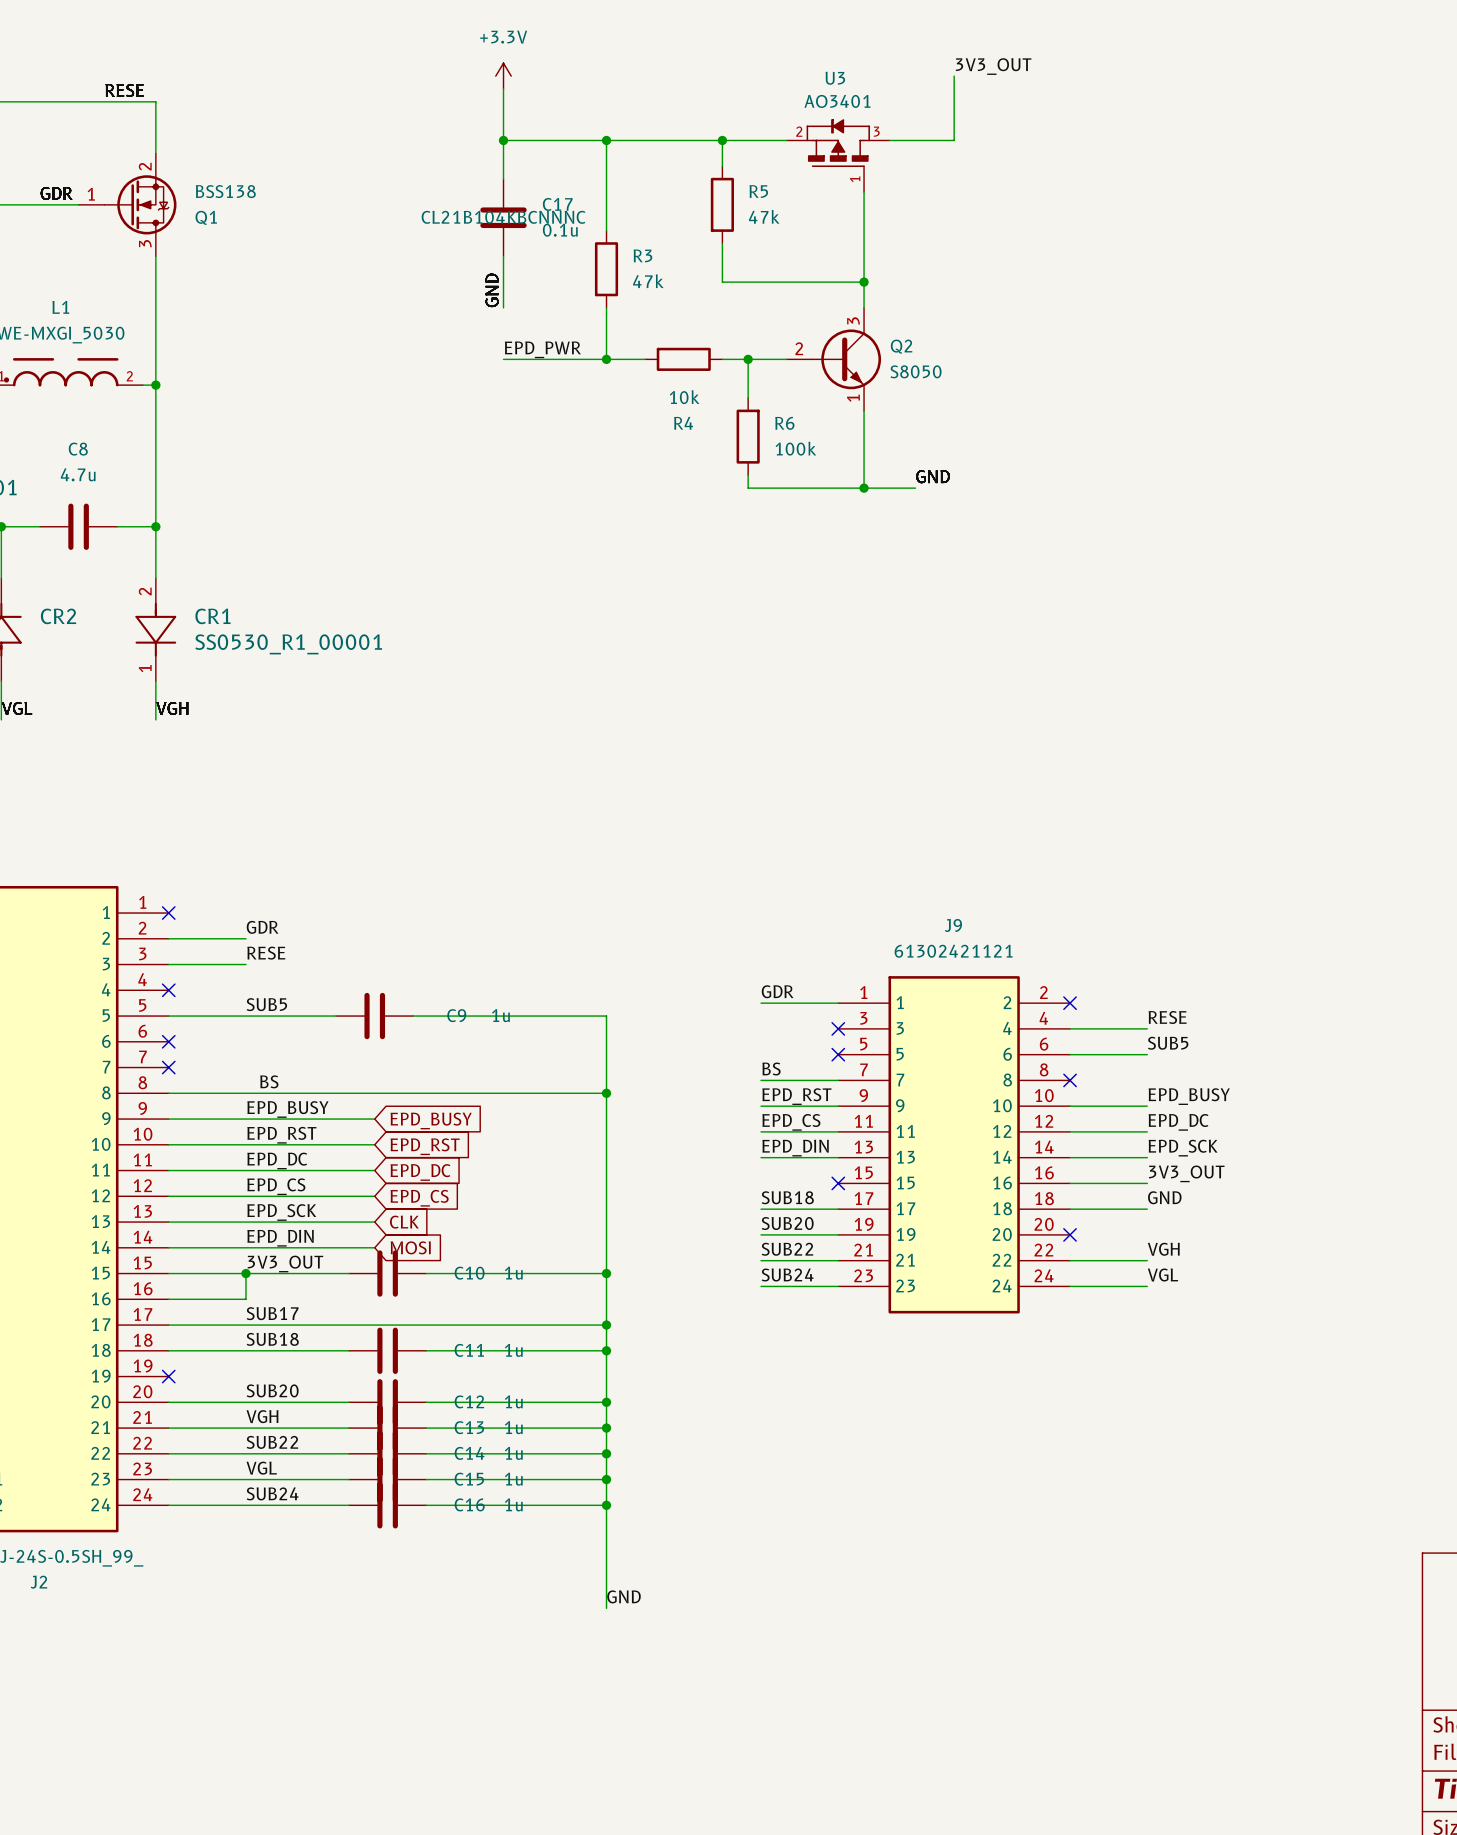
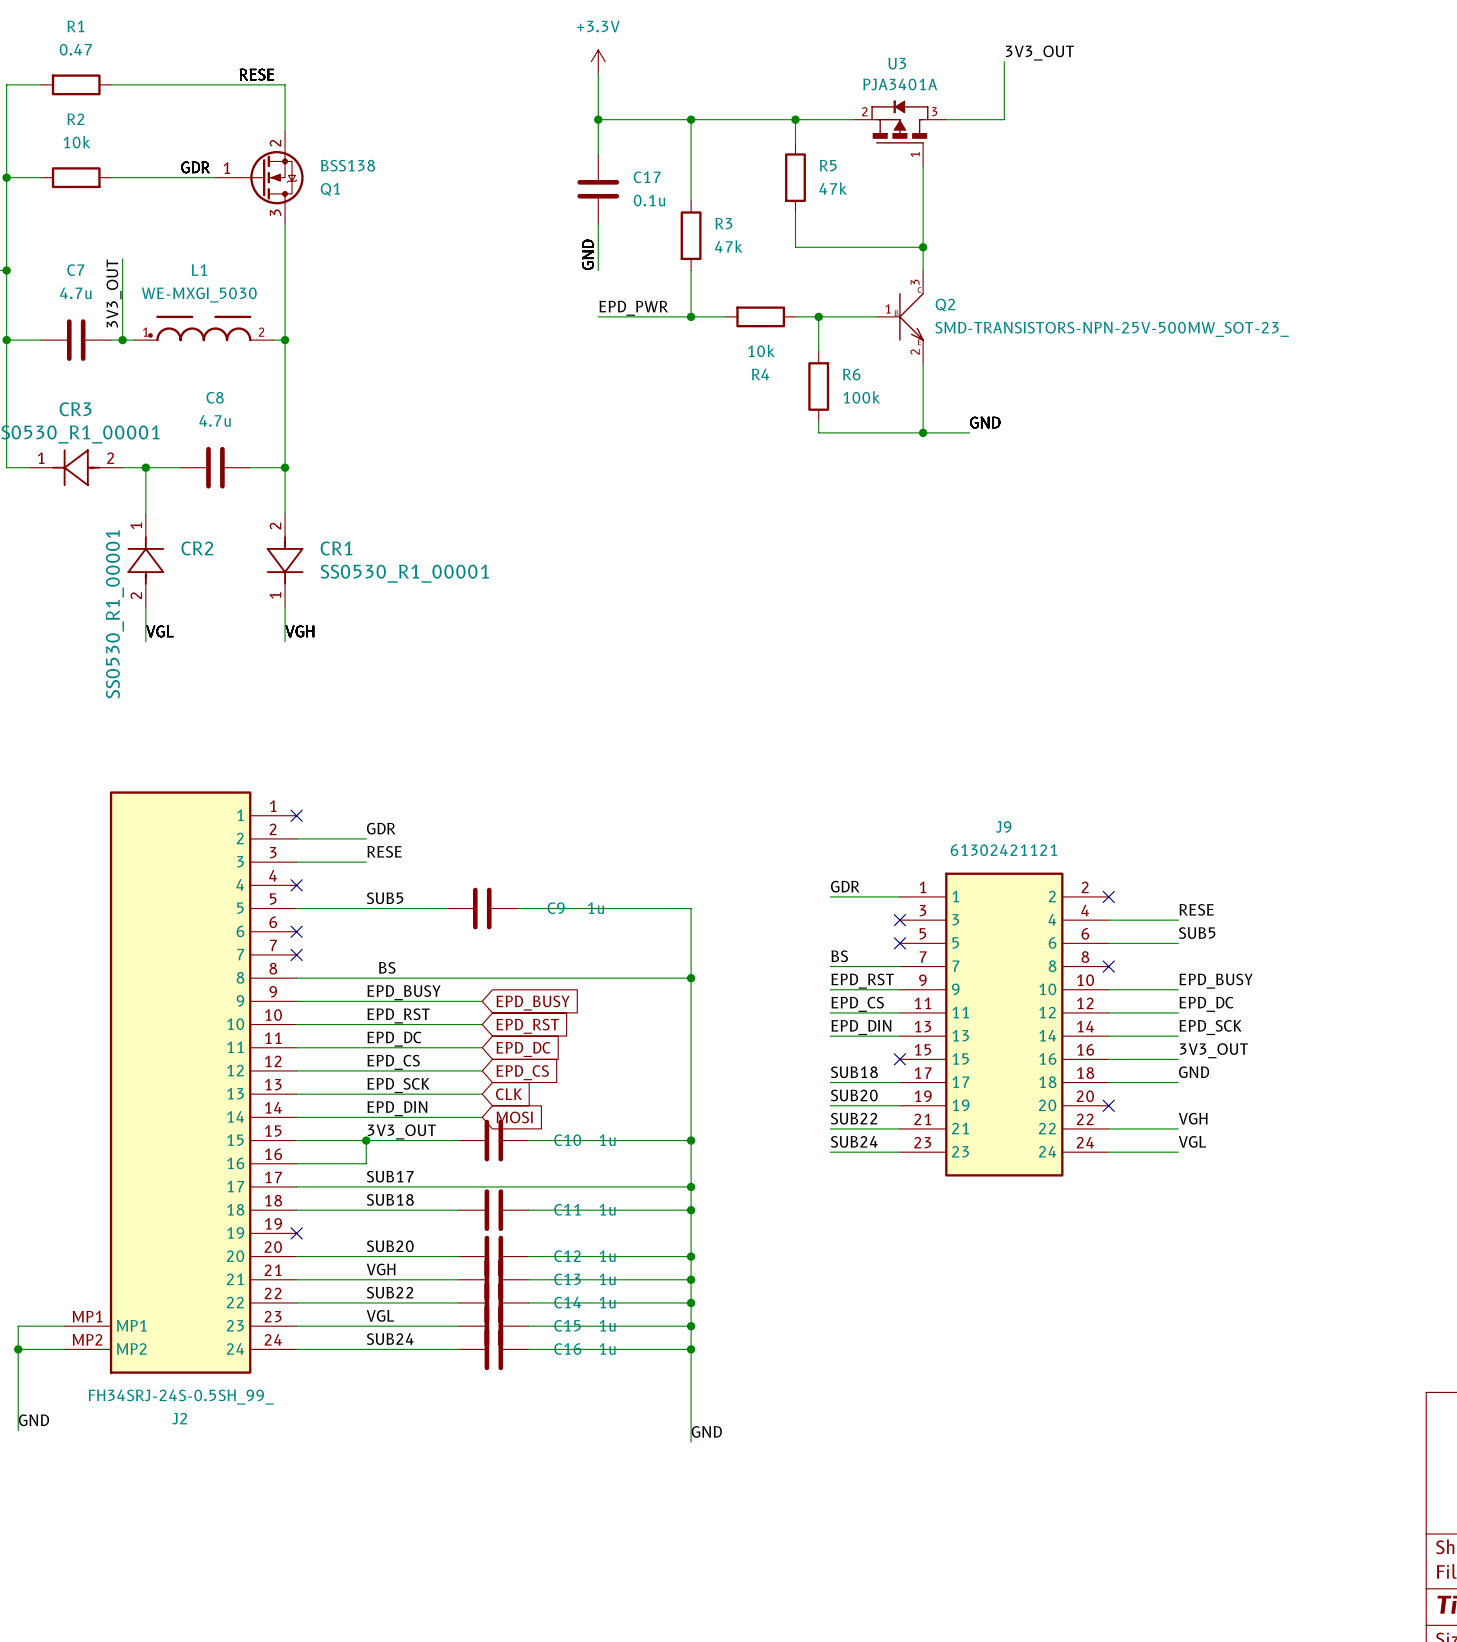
U3 value: AO3401 (837, 101) -> PJA3401A (900, 84)
C17 text: CL21B104KBCNNNC (503, 217) -> none
Q2 symbol: [786, 307, 882, 411] -> [876, 270, 924, 364]
Q2 value: S8050 (916, 371) -> SMD-TRANSISTORS-NPN-25V-500MW_SOT-23_ (1112, 329)

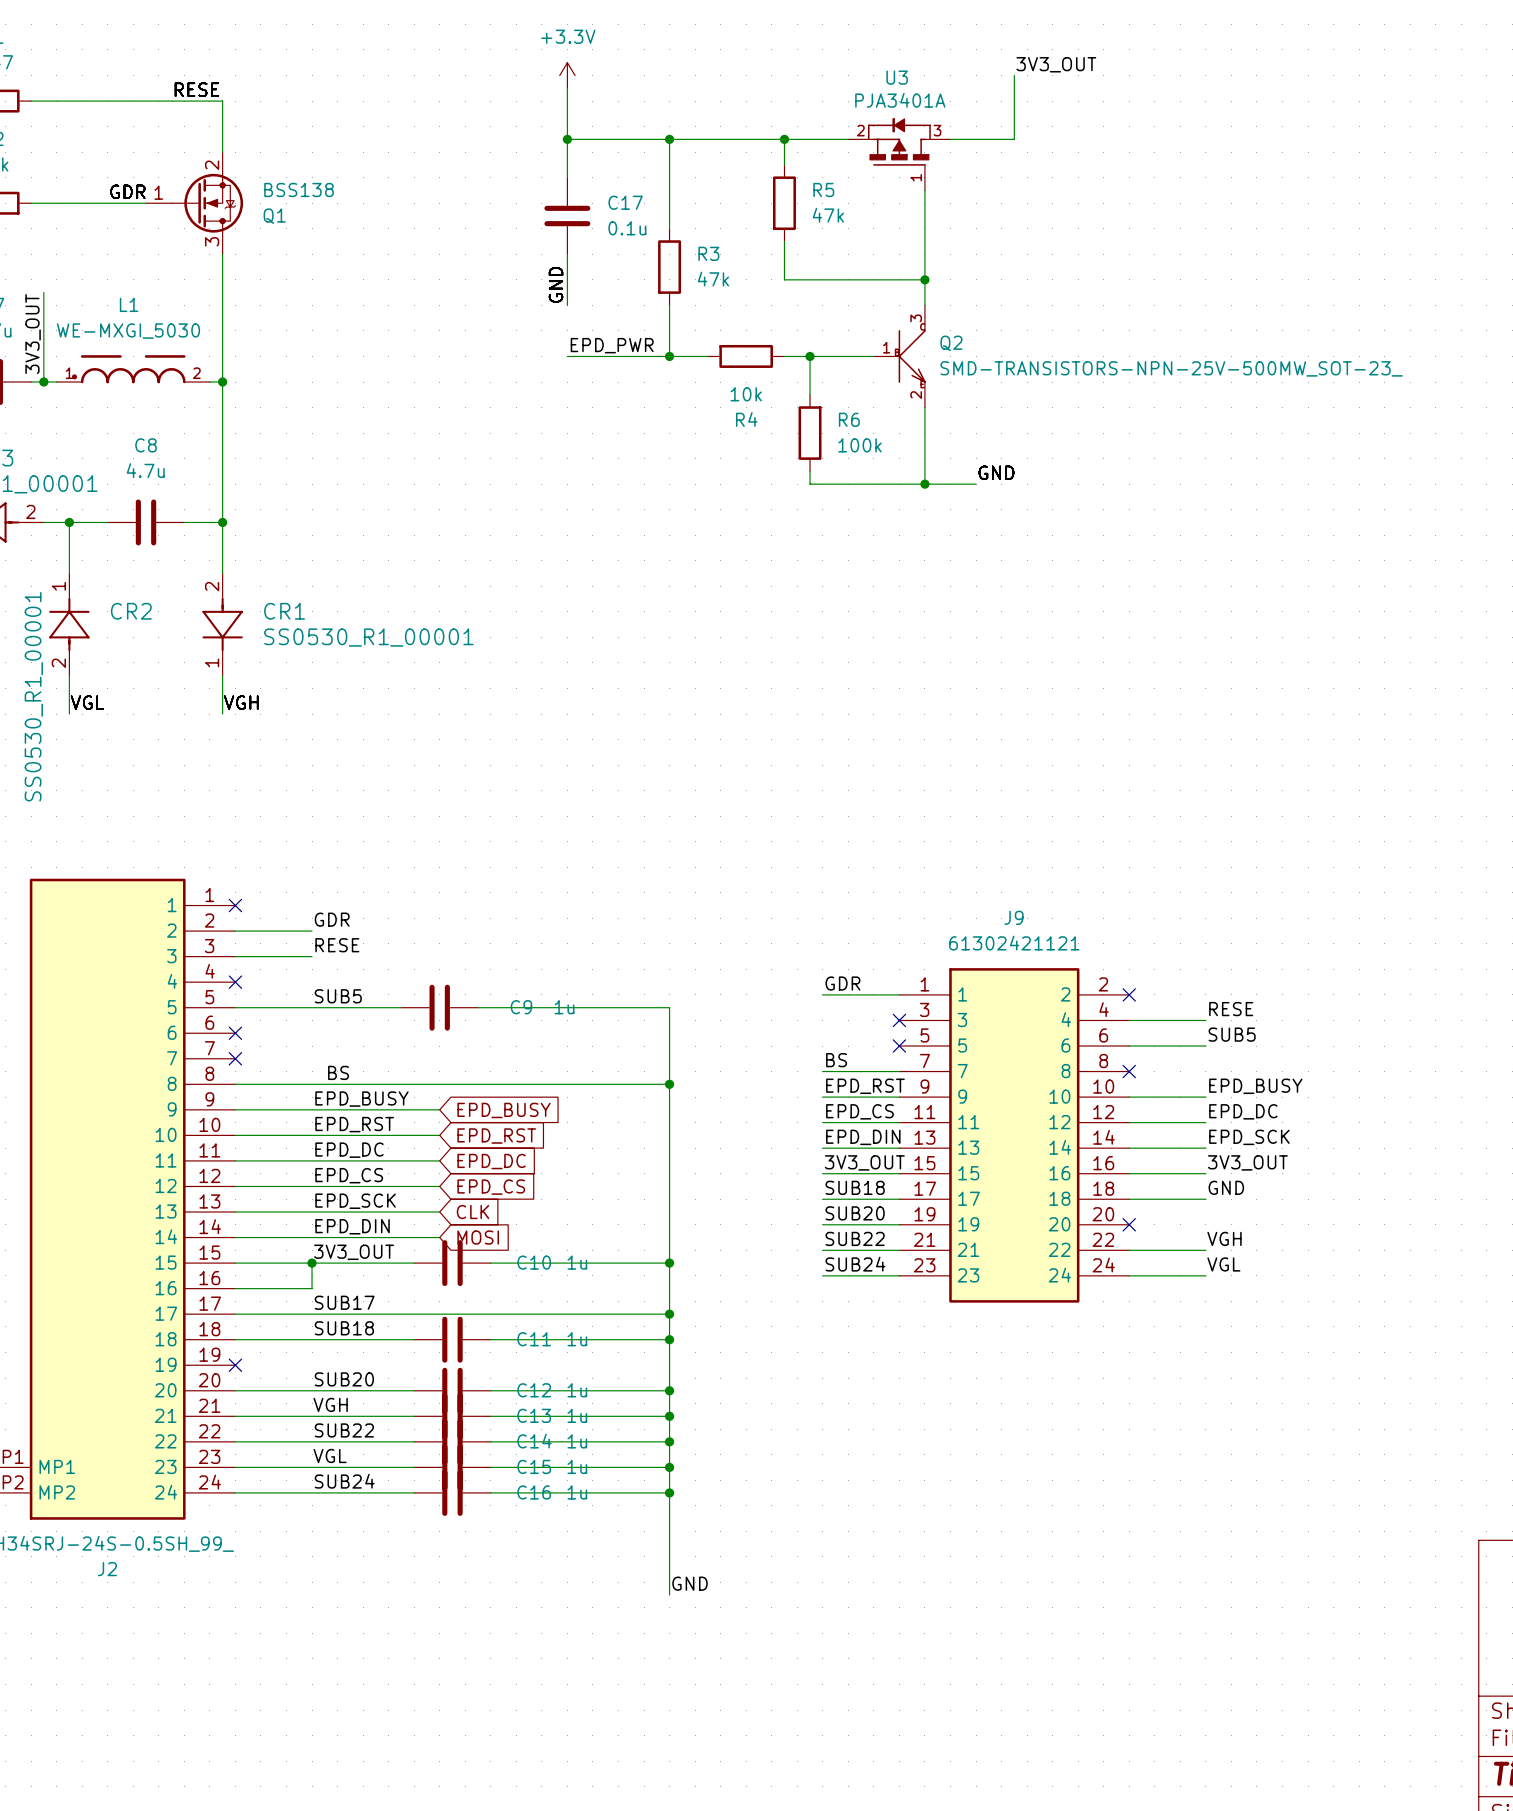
label: none -> 3V3_OUT (864, 1162)
wire: none -> (822, 1173) (899, 1173)
no-connect mark: (899, 1059) -> none

